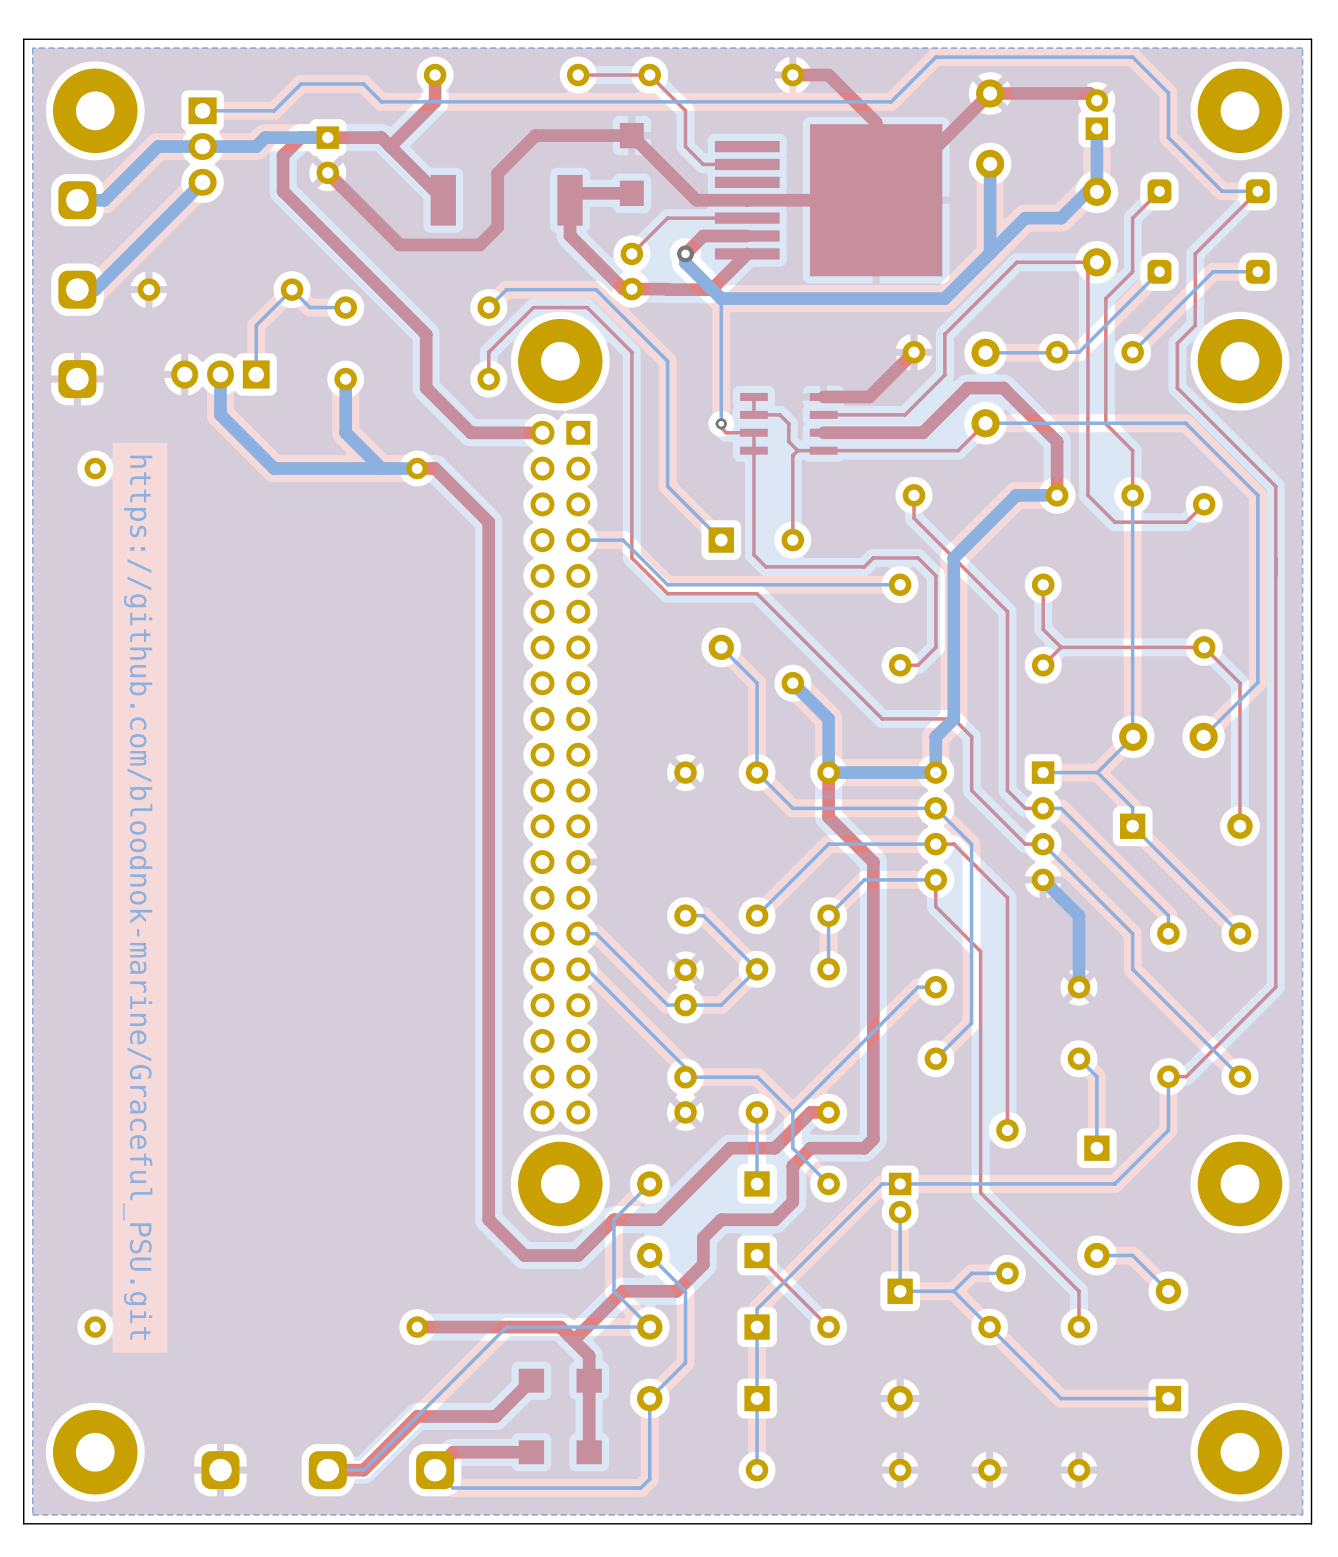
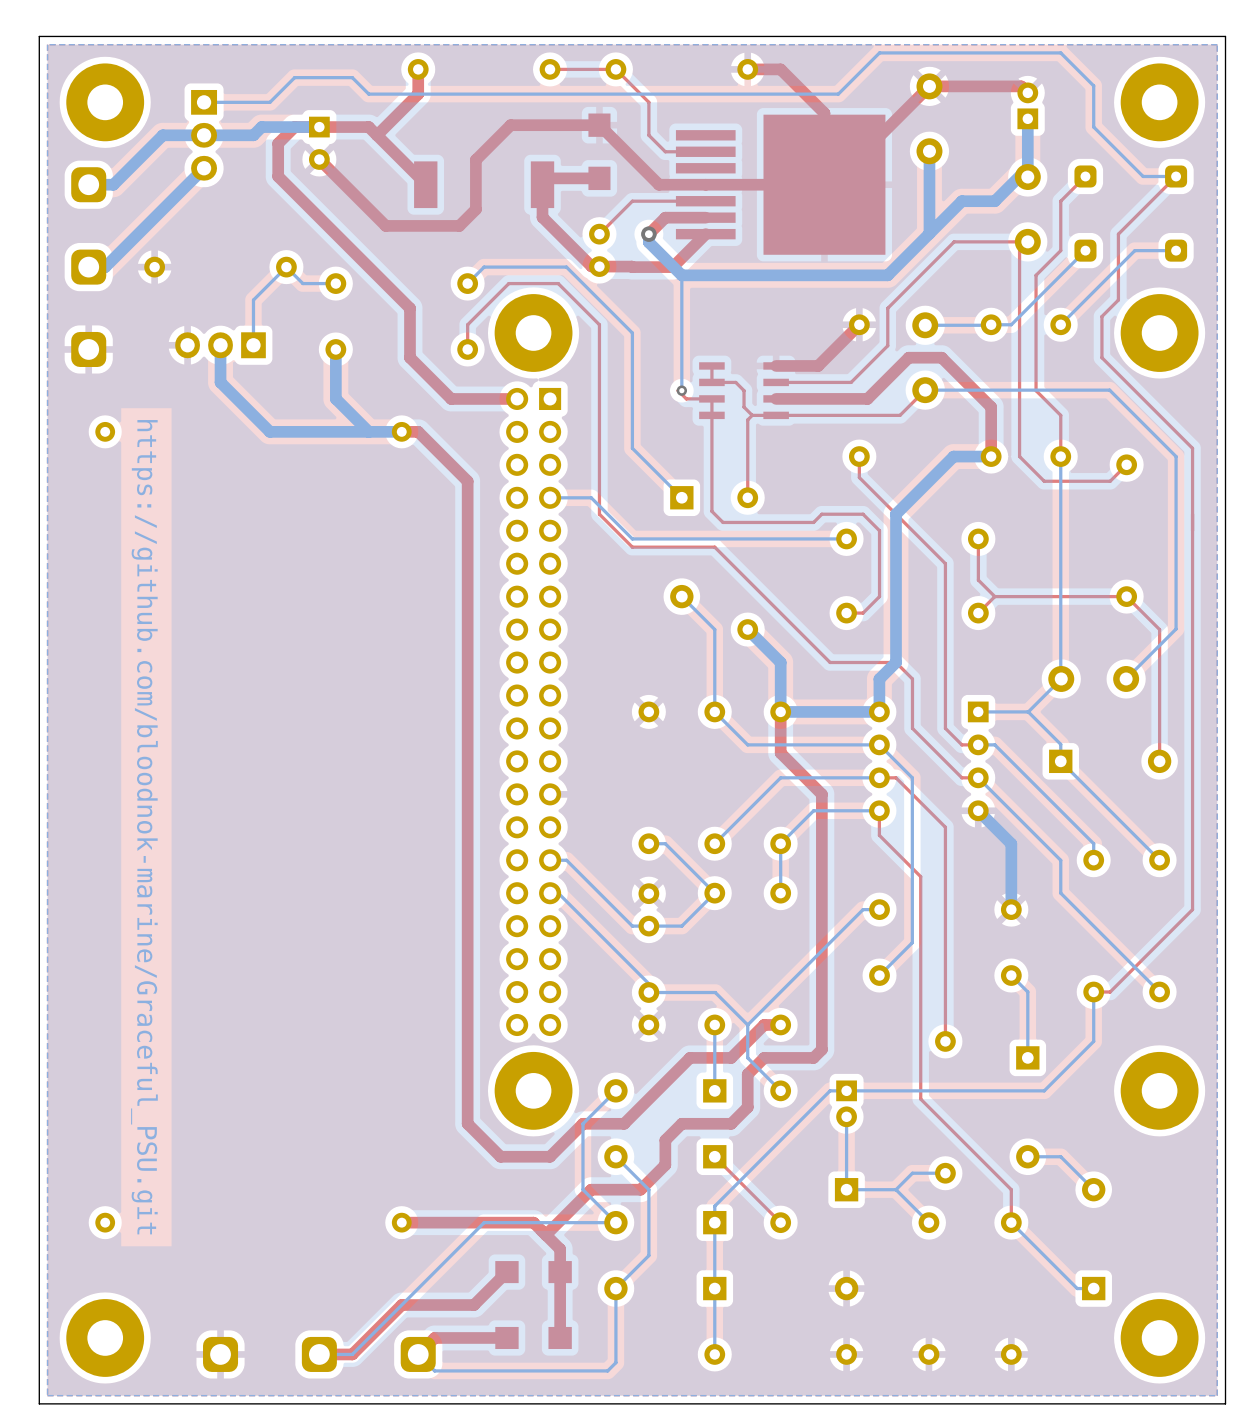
bottom track: (989, 1327) (1061, 1398) (1150, 1398) -> (1011, 1222) (1077, 1288)

